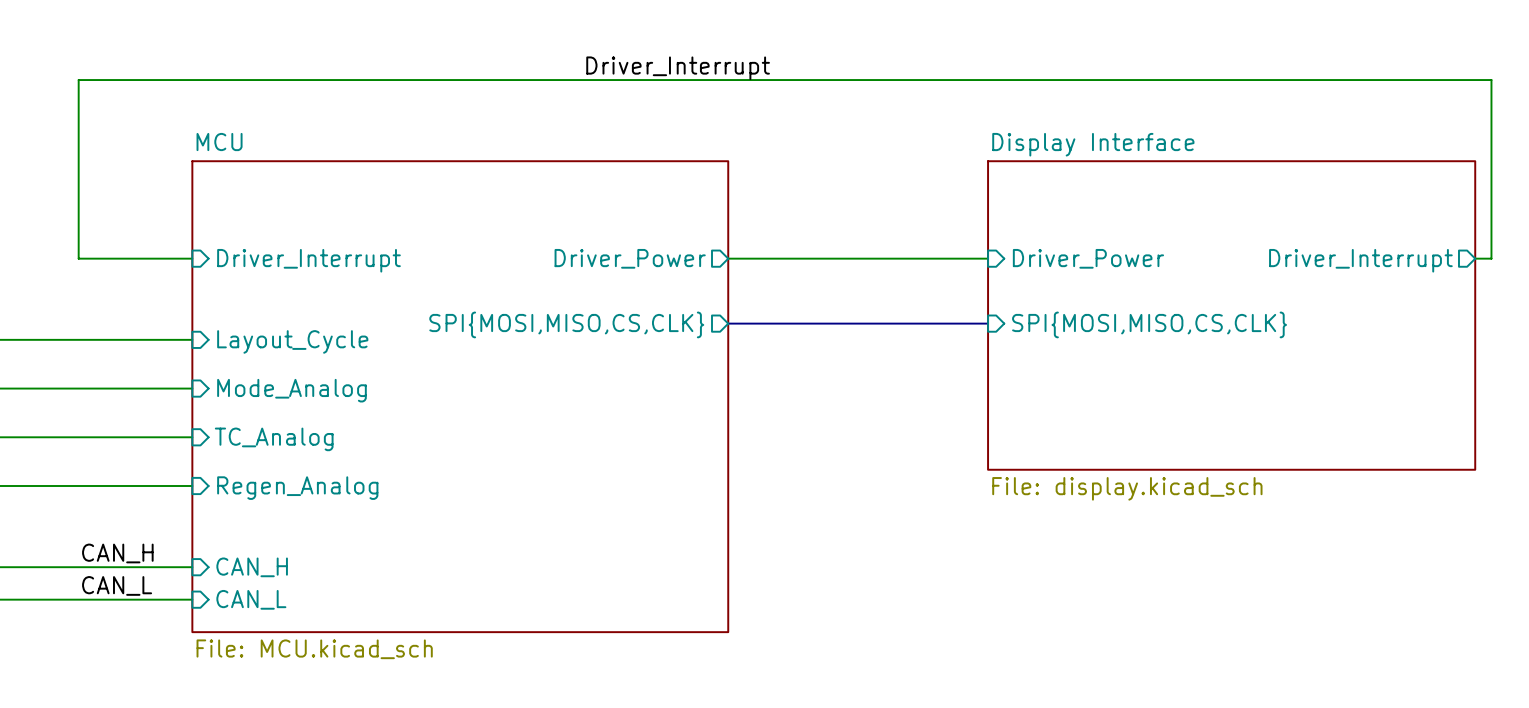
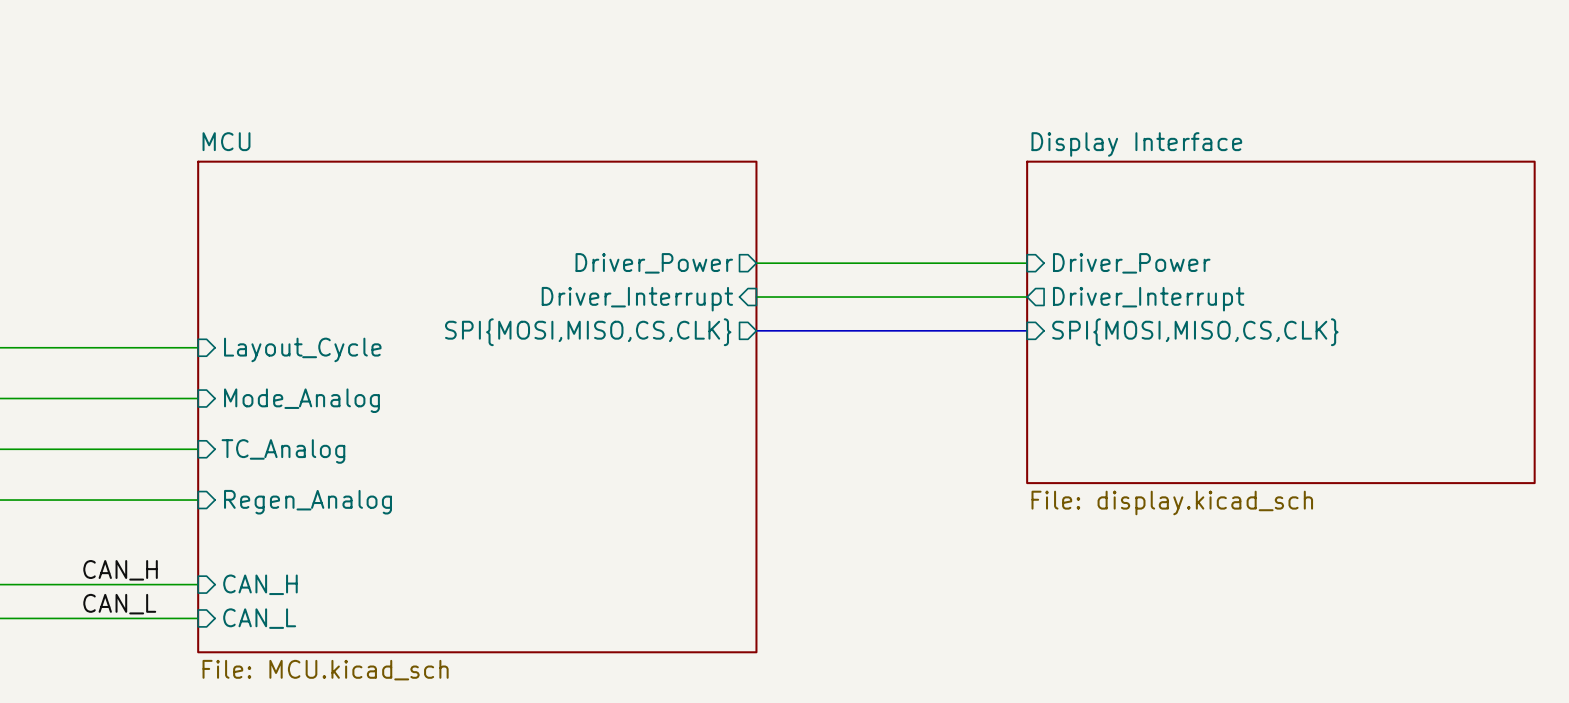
label: Driver_Interrupt (678, 68) -> none
wire: (192, 258) (78, 258) (78, 80) (1491, 80) (1491, 258) (1475, 258) -> none
sheet pin: Driver_Interrupt (308, 260) -> none
sheet pin: Driver_Interrupt (1360, 260) -> none
wire: none -> (756, 297) (1027, 297)
sheet pin: none -> Driver_Interrupt (637, 299)
sheet pin: none -> Driver_Interrupt (1148, 299)

